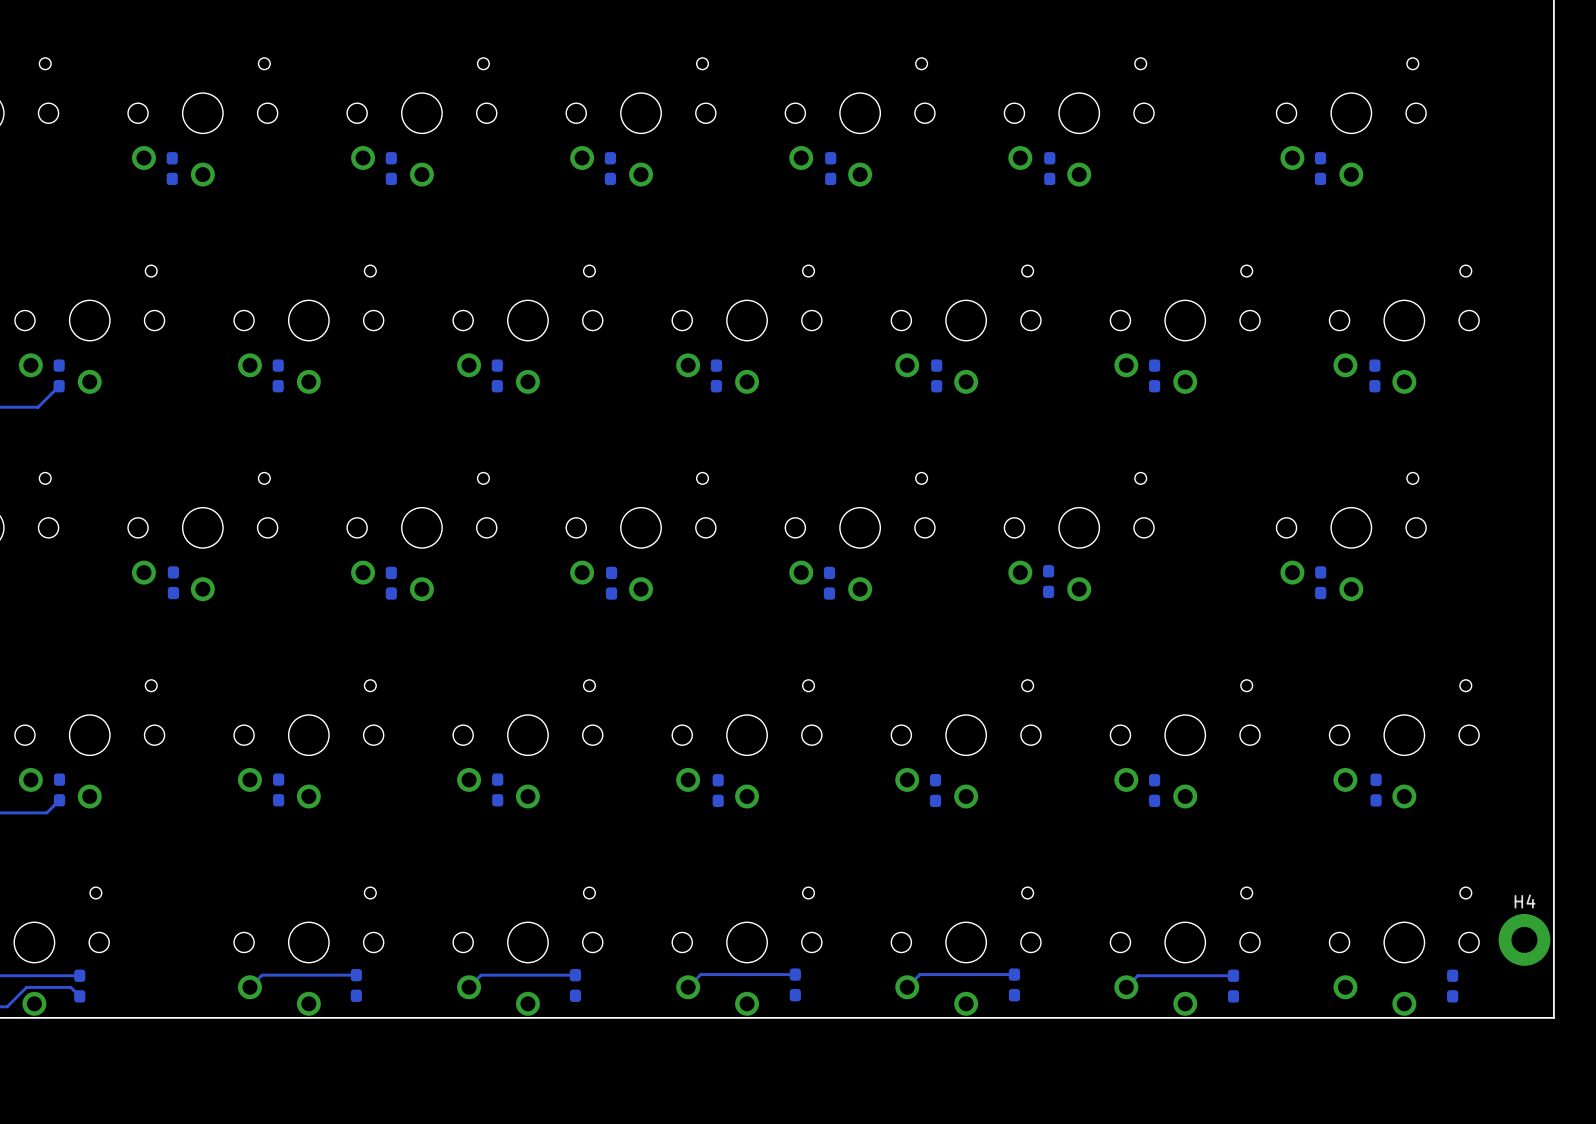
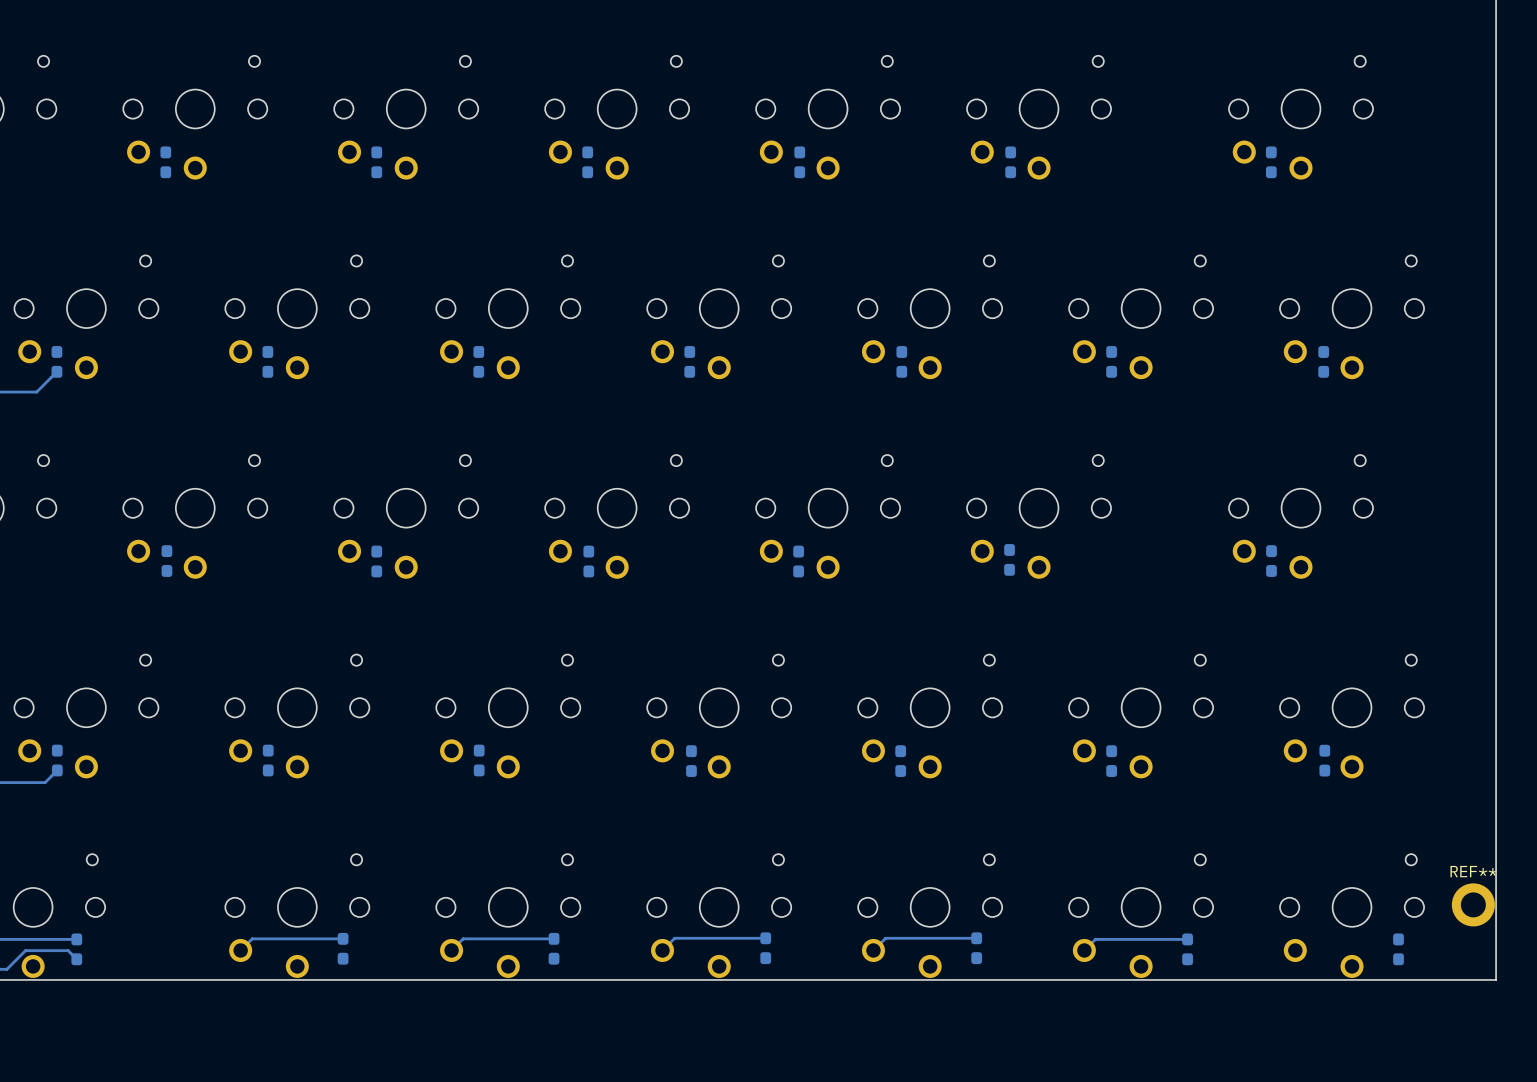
H4: (1524, 939) -> none
REF**: none -> (1473, 904)

